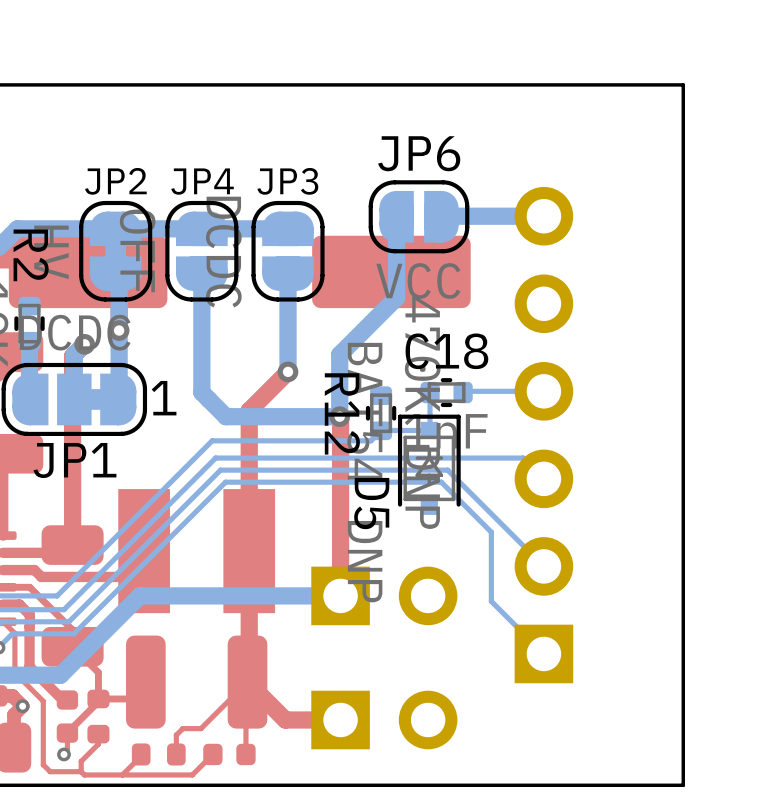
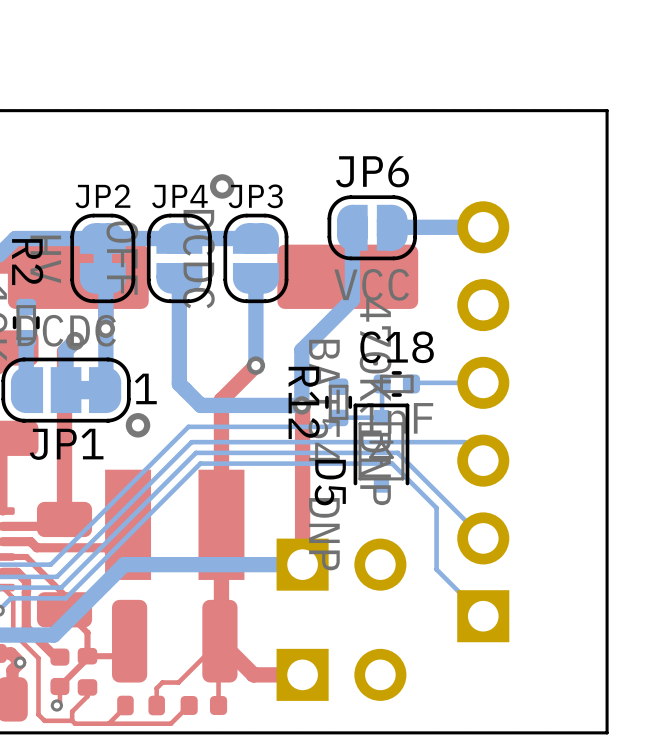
via: none -> (222, 186)
via: none -> (138, 425)

